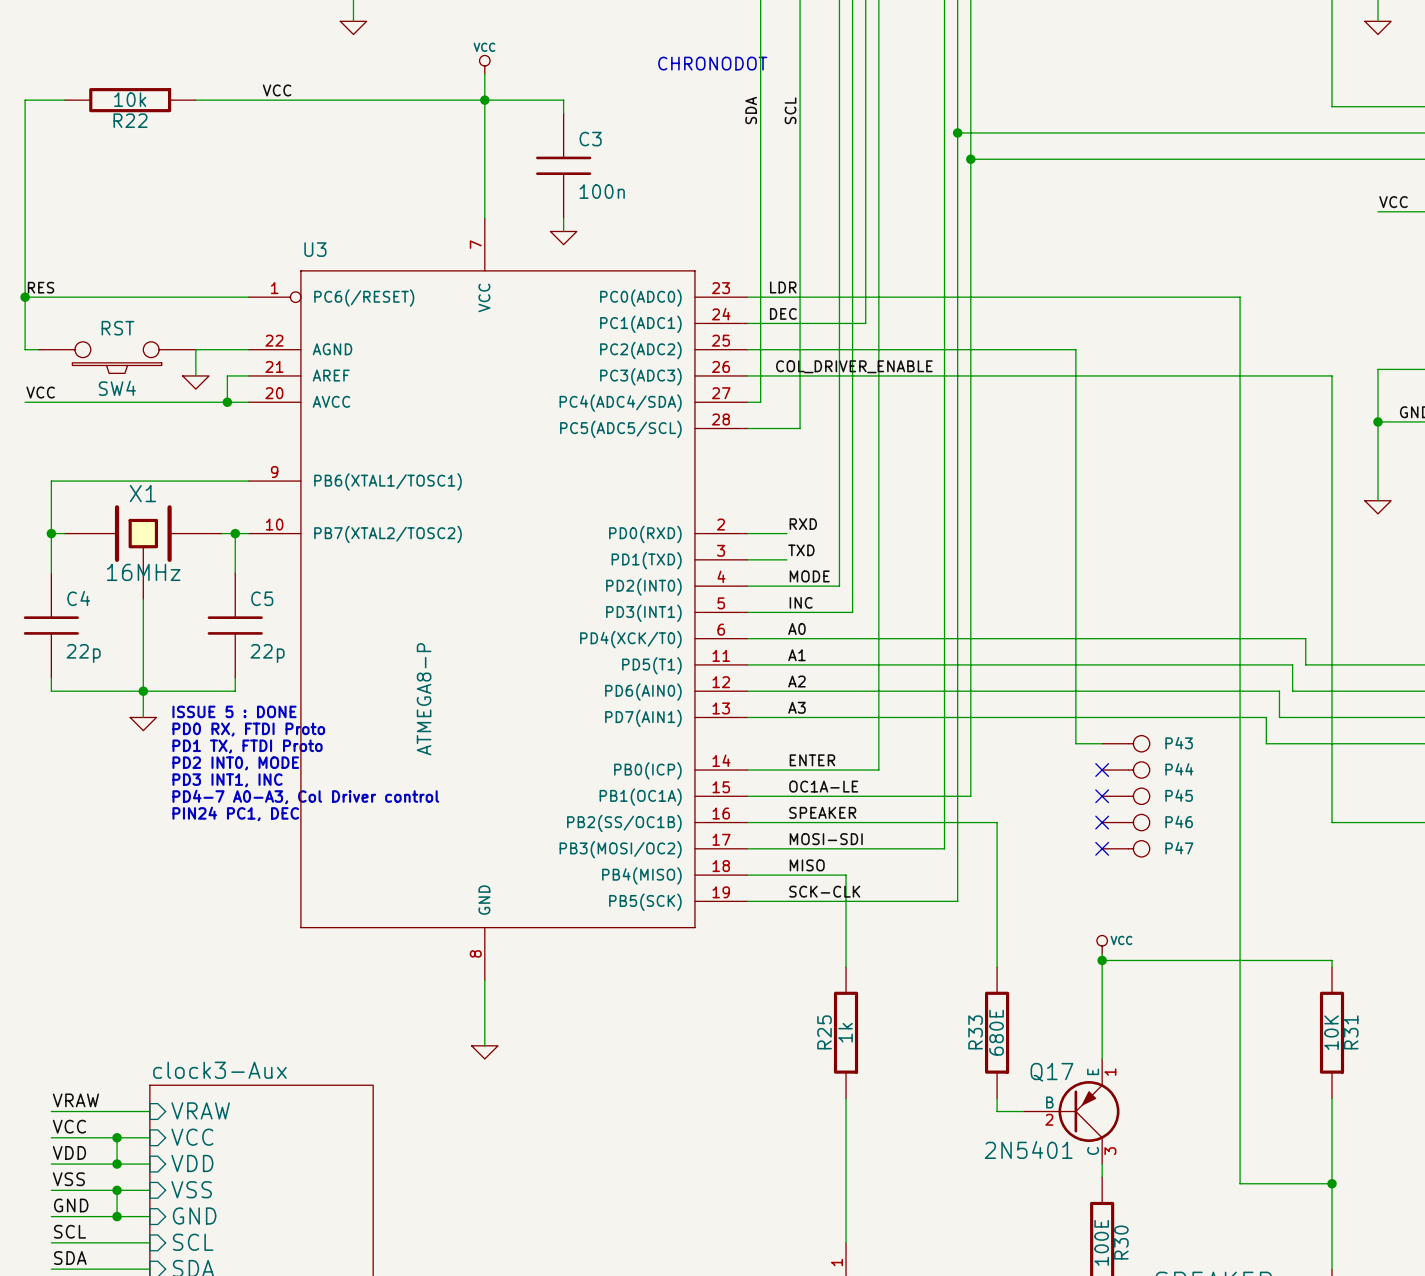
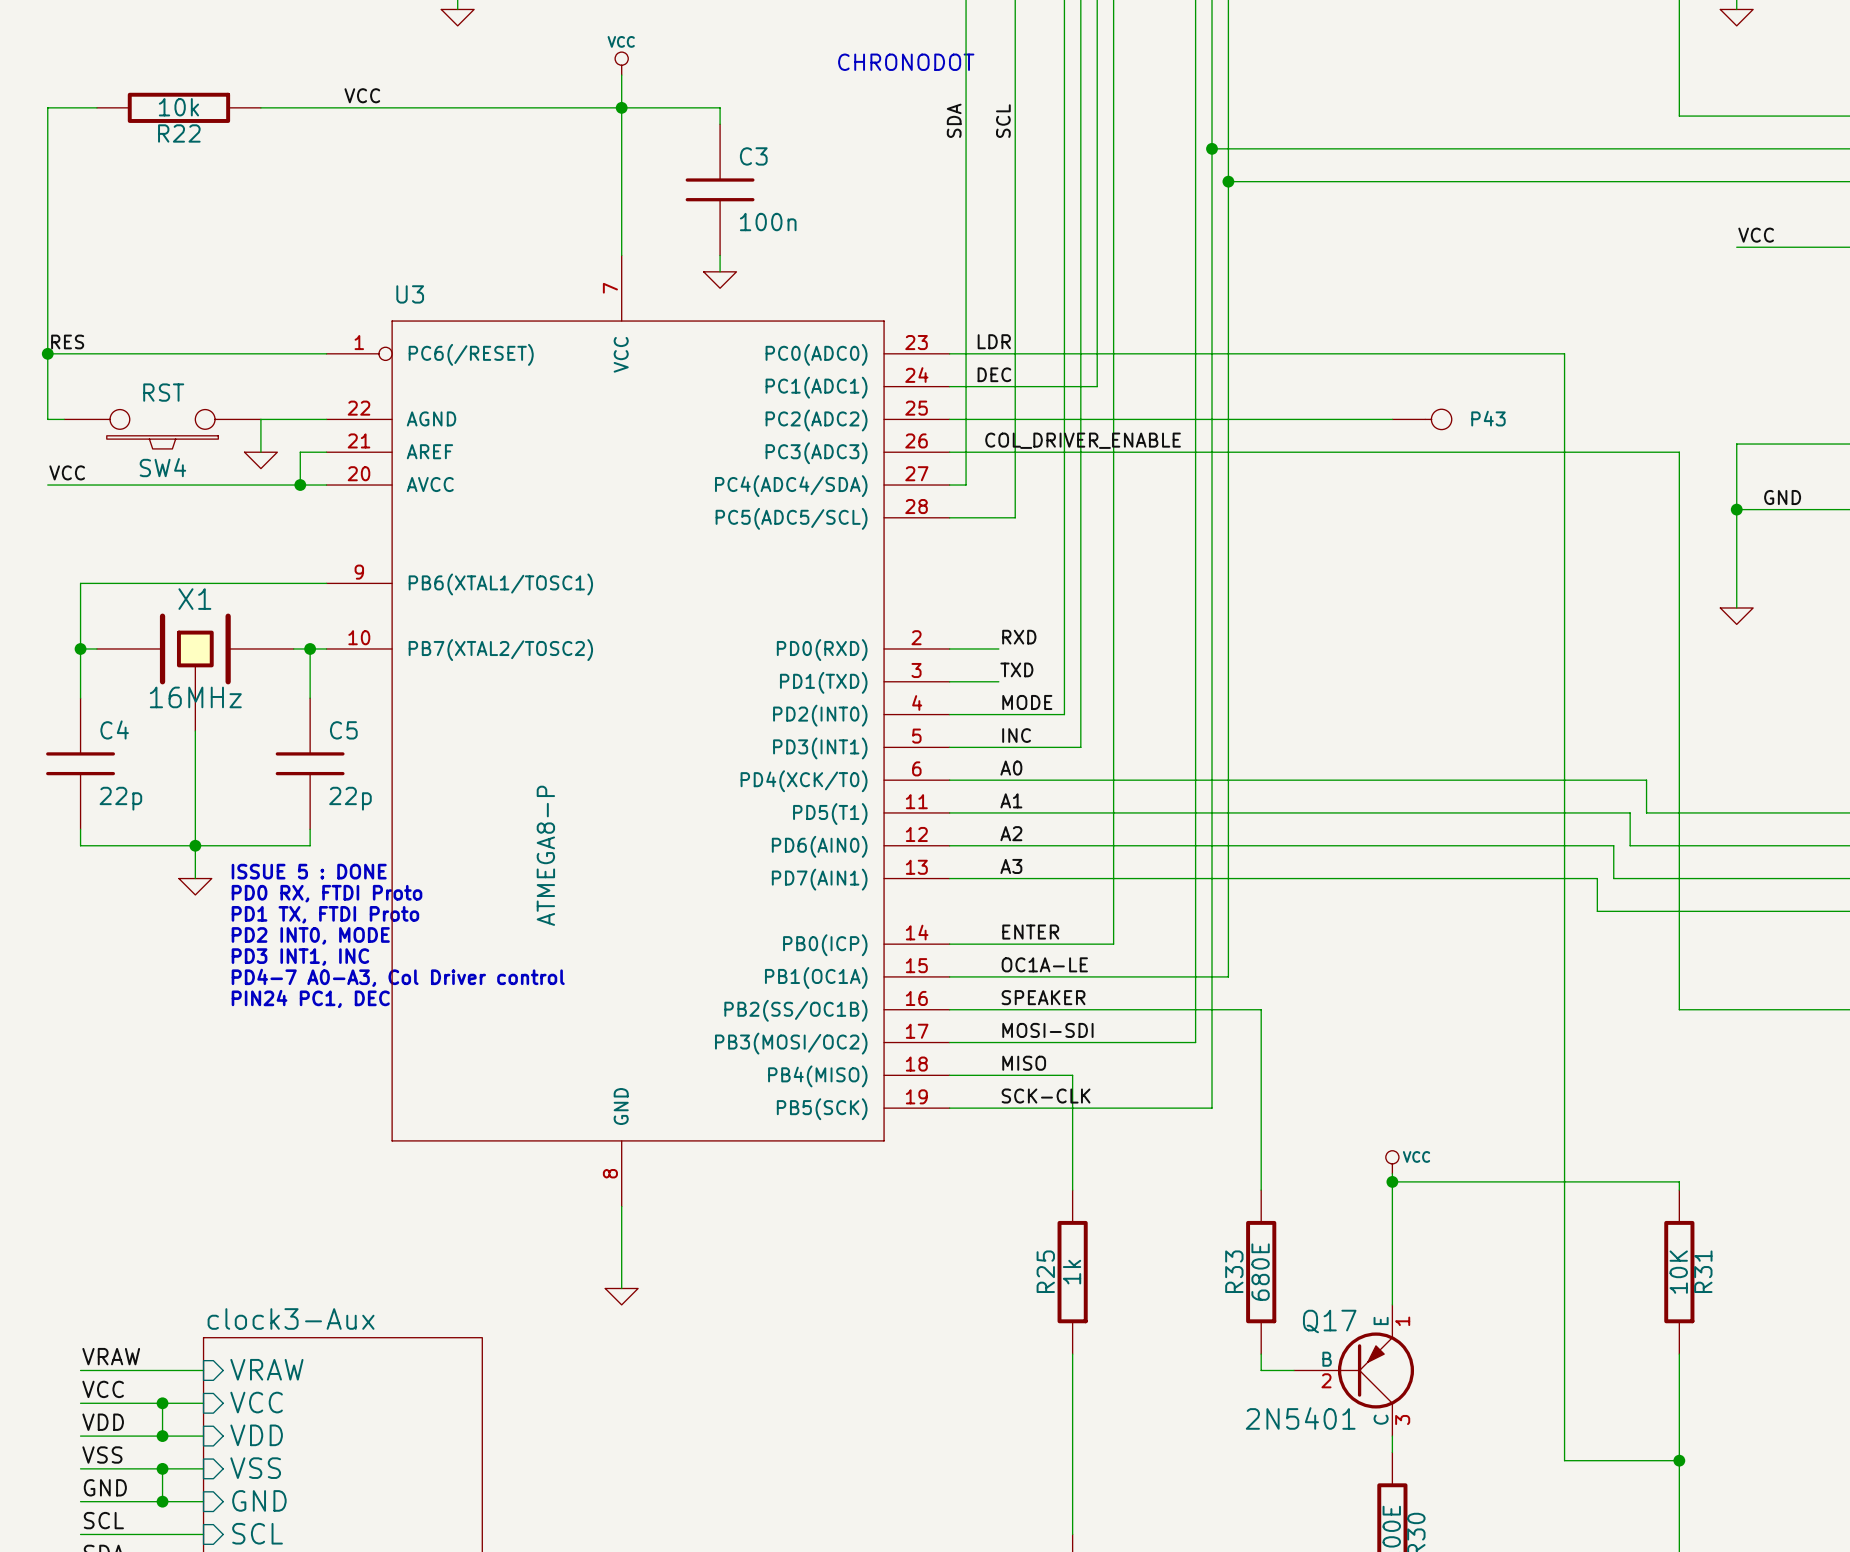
wire: (1075, 349) (1075, 743) (1102, 743) -> (1359, 419) (1392, 419)
P43 position: (1125, 743) -> (1422, 419)
no-connect mark: (1102, 770) -> none
P44: (1125, 770) -> none
no-connect mark: (1102, 796) -> none
P45: (1125, 796) -> none
no-connect mark: (1102, 822) -> none
P46: (1125, 822) -> none
no-connect mark: (1102, 848) -> none
P47: (1125, 848) -> none

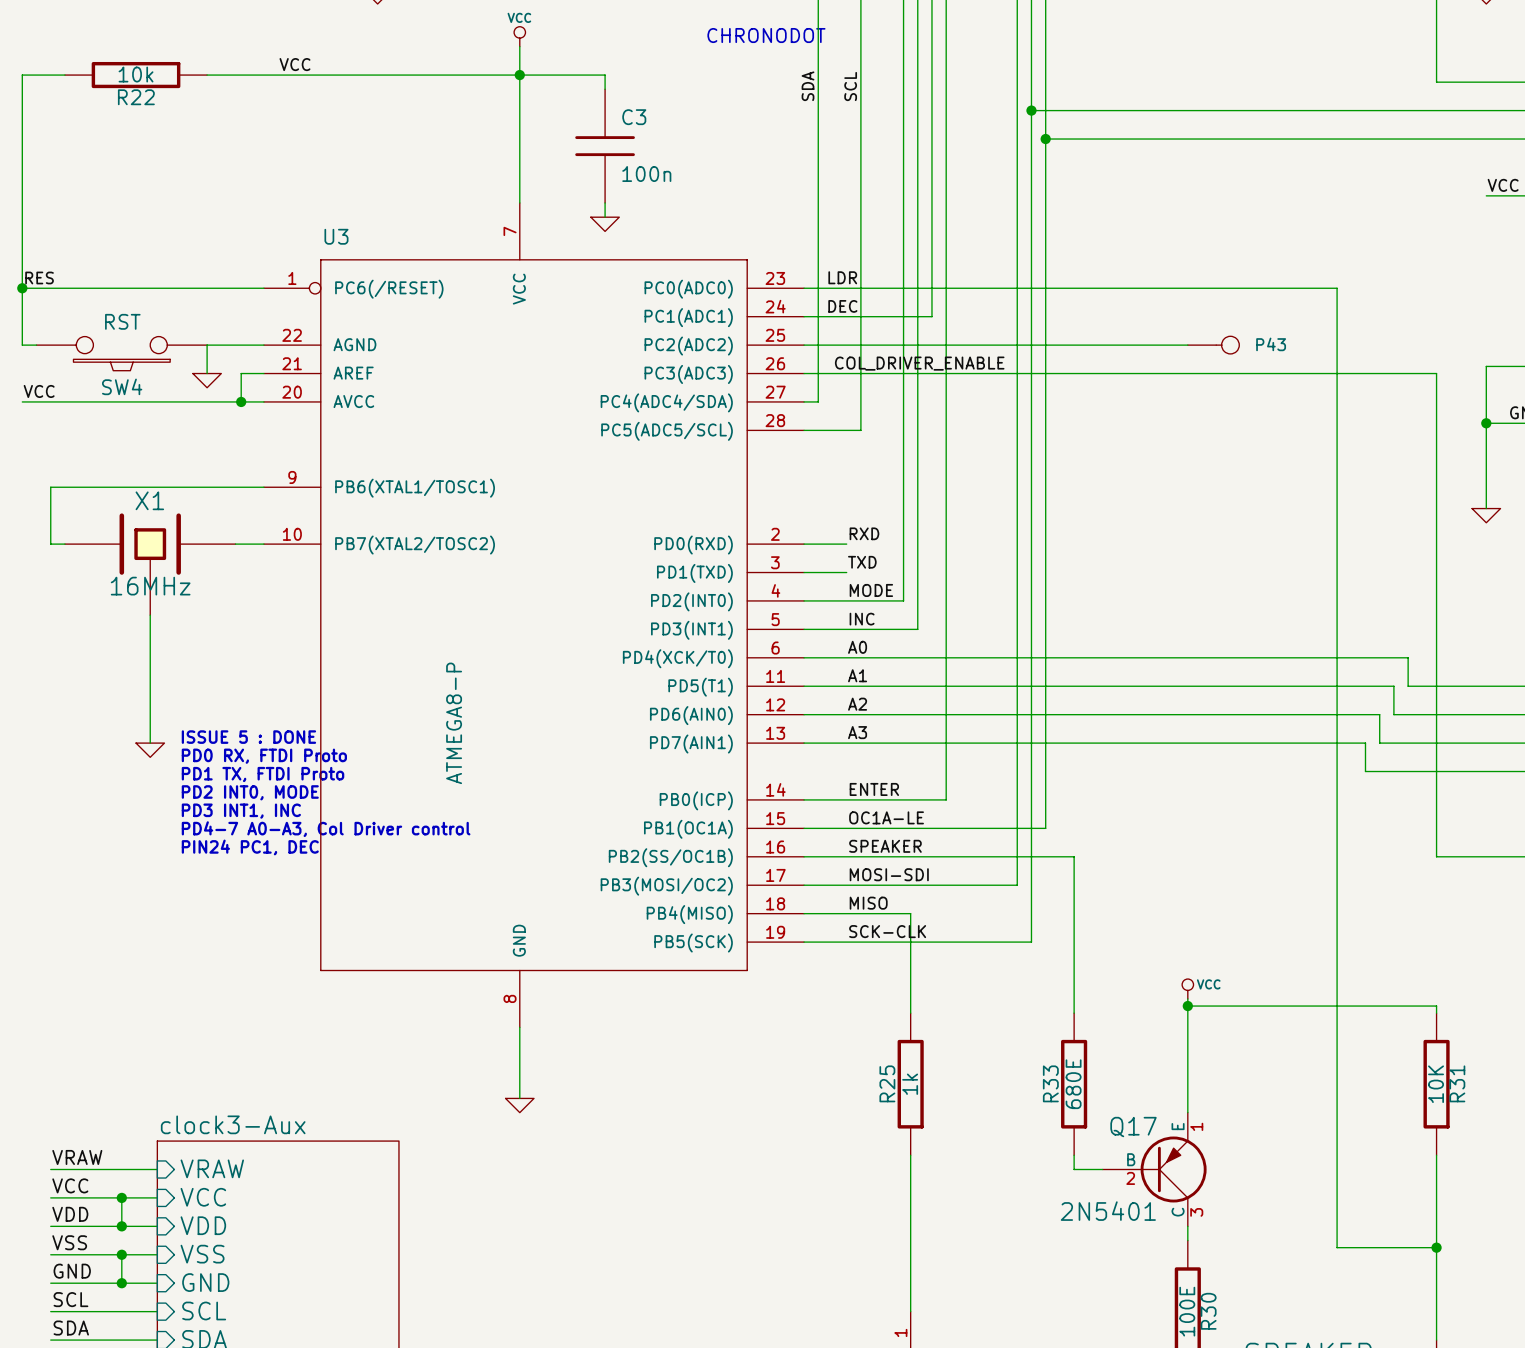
wire: (80, 648) (80, 698) -> none
junction: (80, 648) -> none
wire: (310, 648) (310, 698) -> none
junction: (310, 648) -> none
C4: 22p (80, 763) -> none
C5: 22p (310, 763) -> none
wire: (80, 829) (80, 845) (310, 845) (310, 829) -> none
junction: (195, 845) -> none

